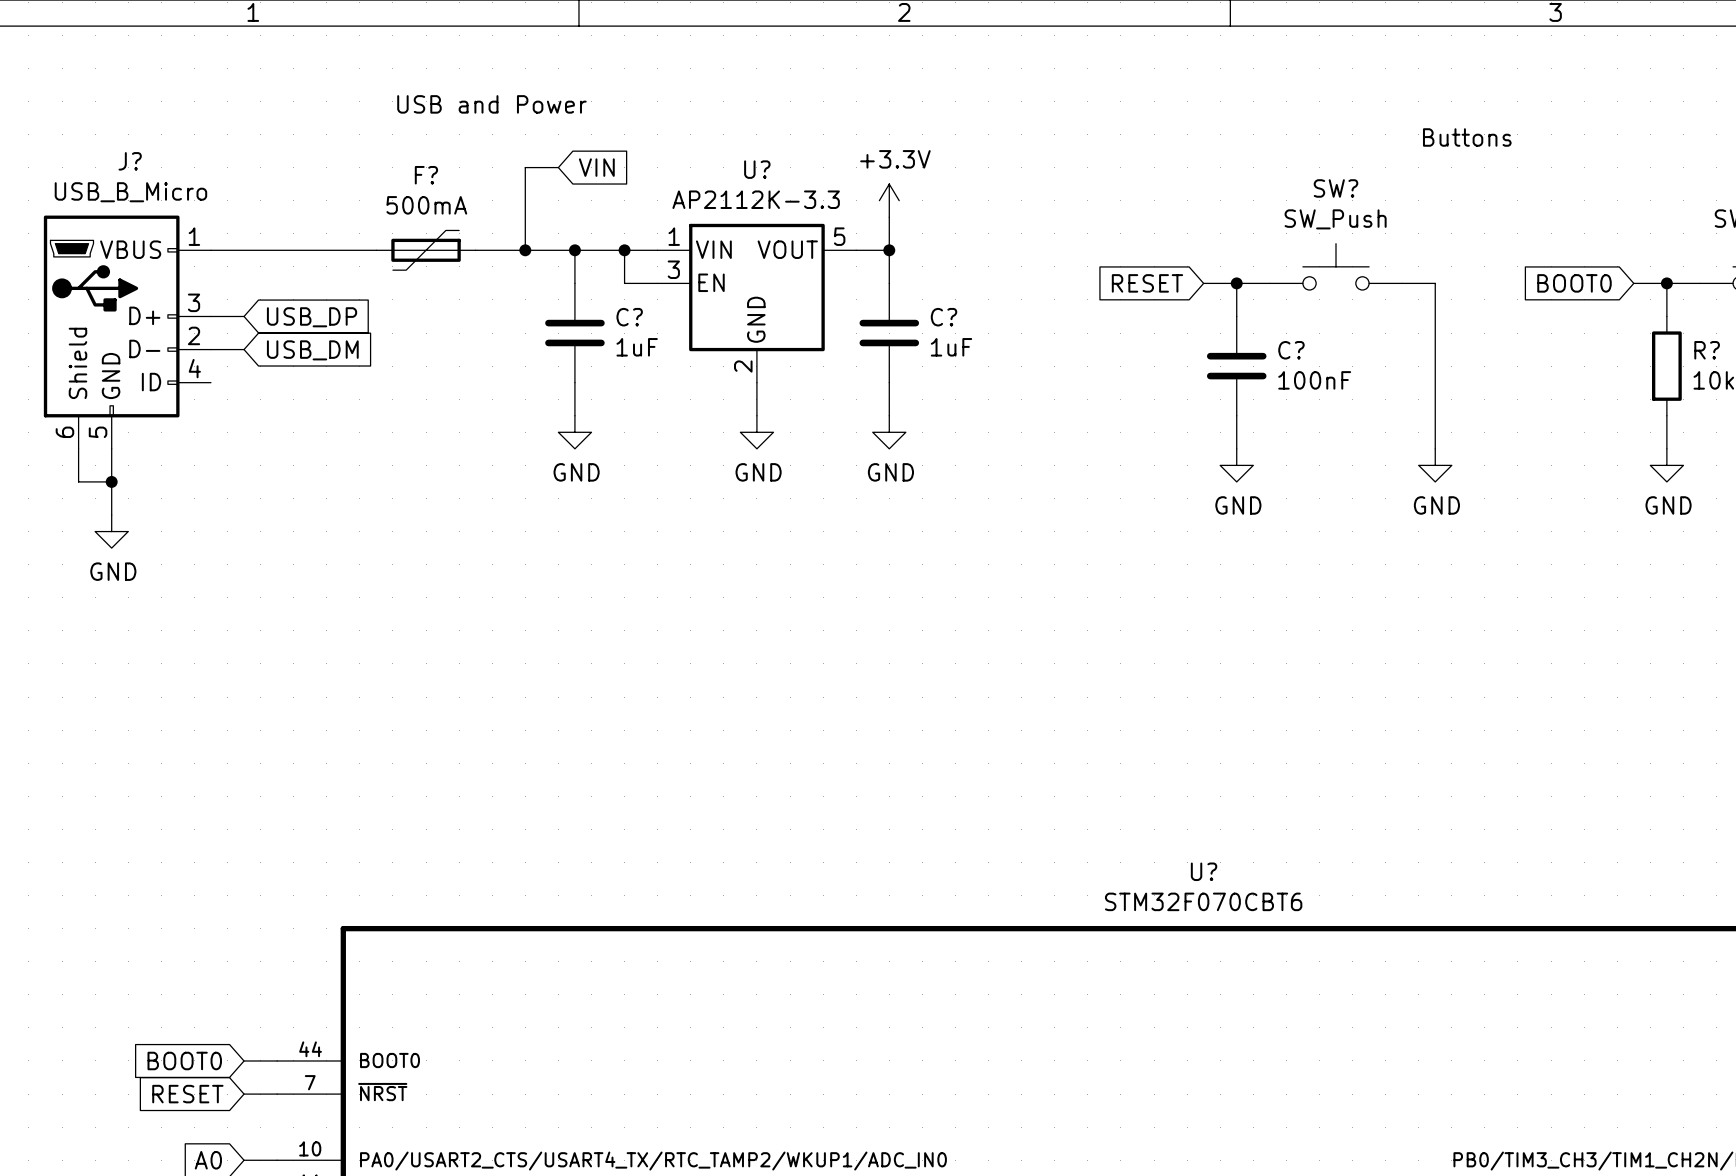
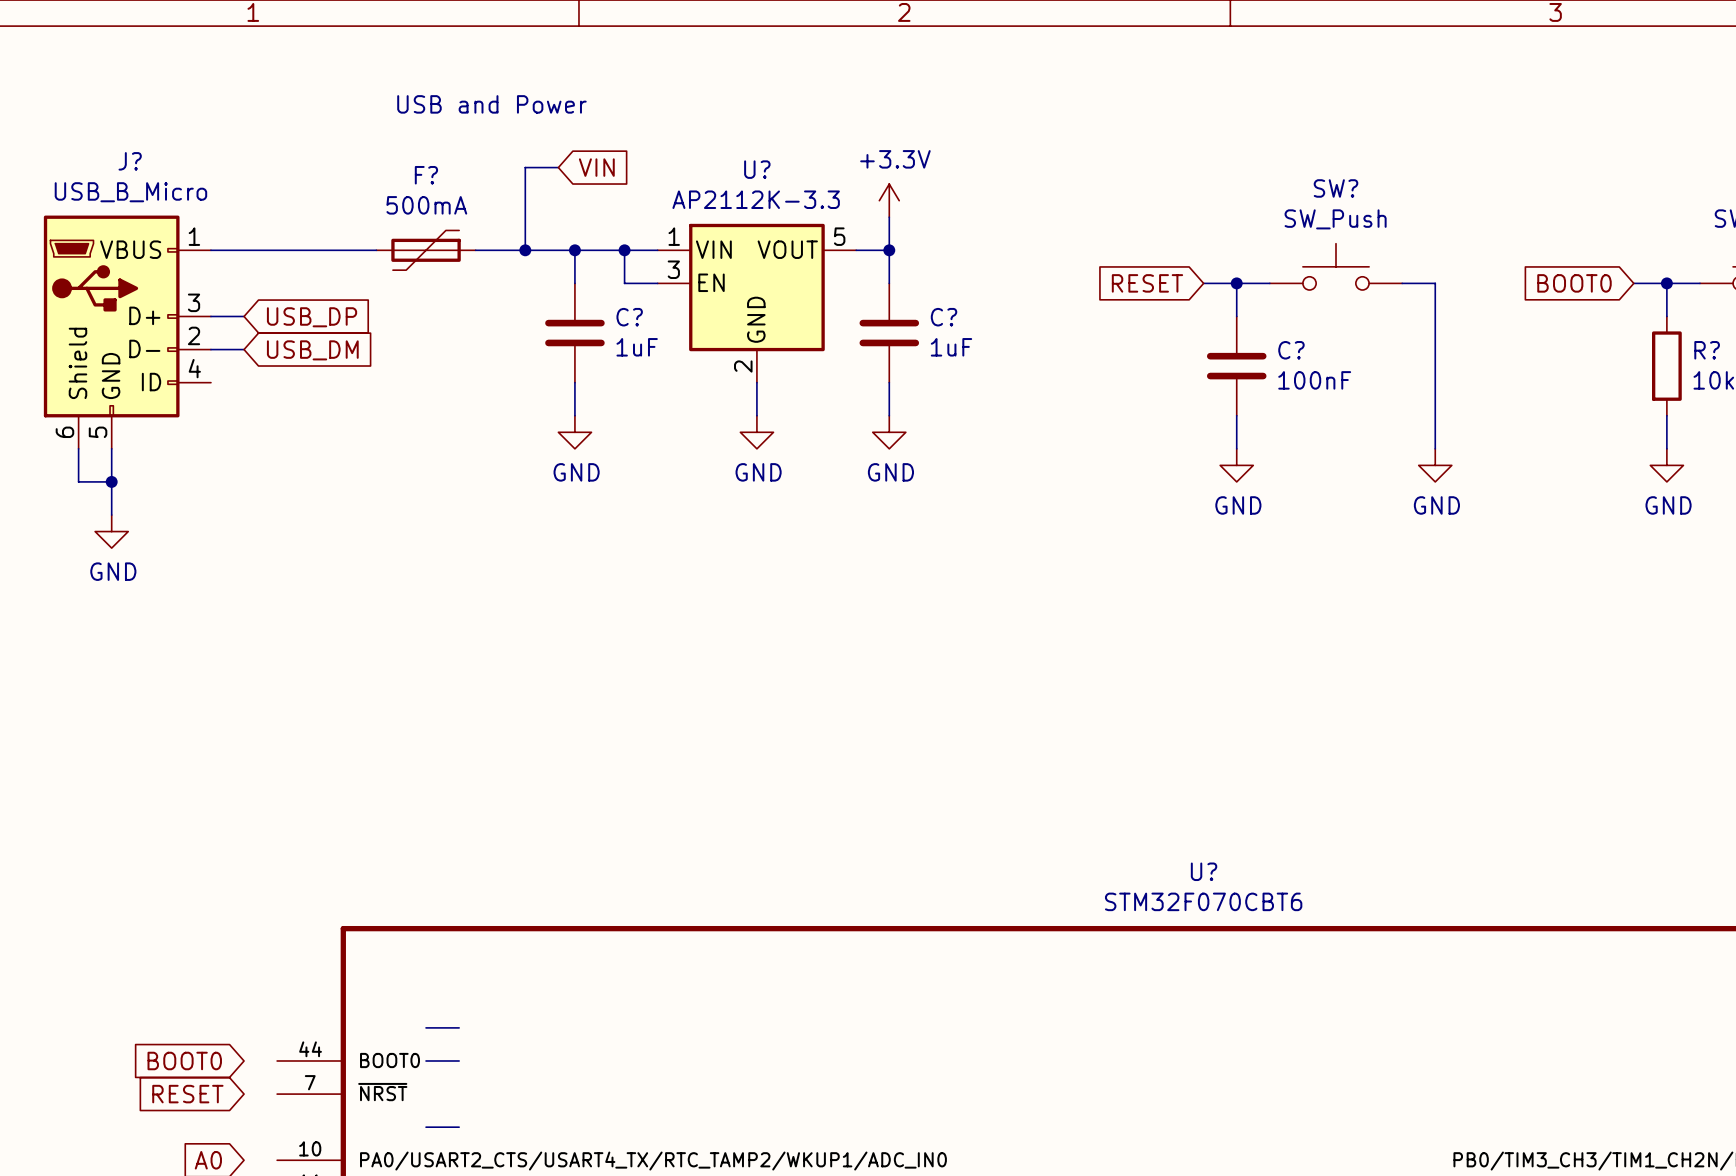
text: Buttons (1467, 137) -> none
wire: (244, 1060) (277, 1060) -> (426, 1027) (459, 1027)
wire: (244, 1094) (277, 1094) -> (426, 1060) (459, 1060)
wire: (244, 1160) (277, 1160) -> (426, 1127) (459, 1127)

